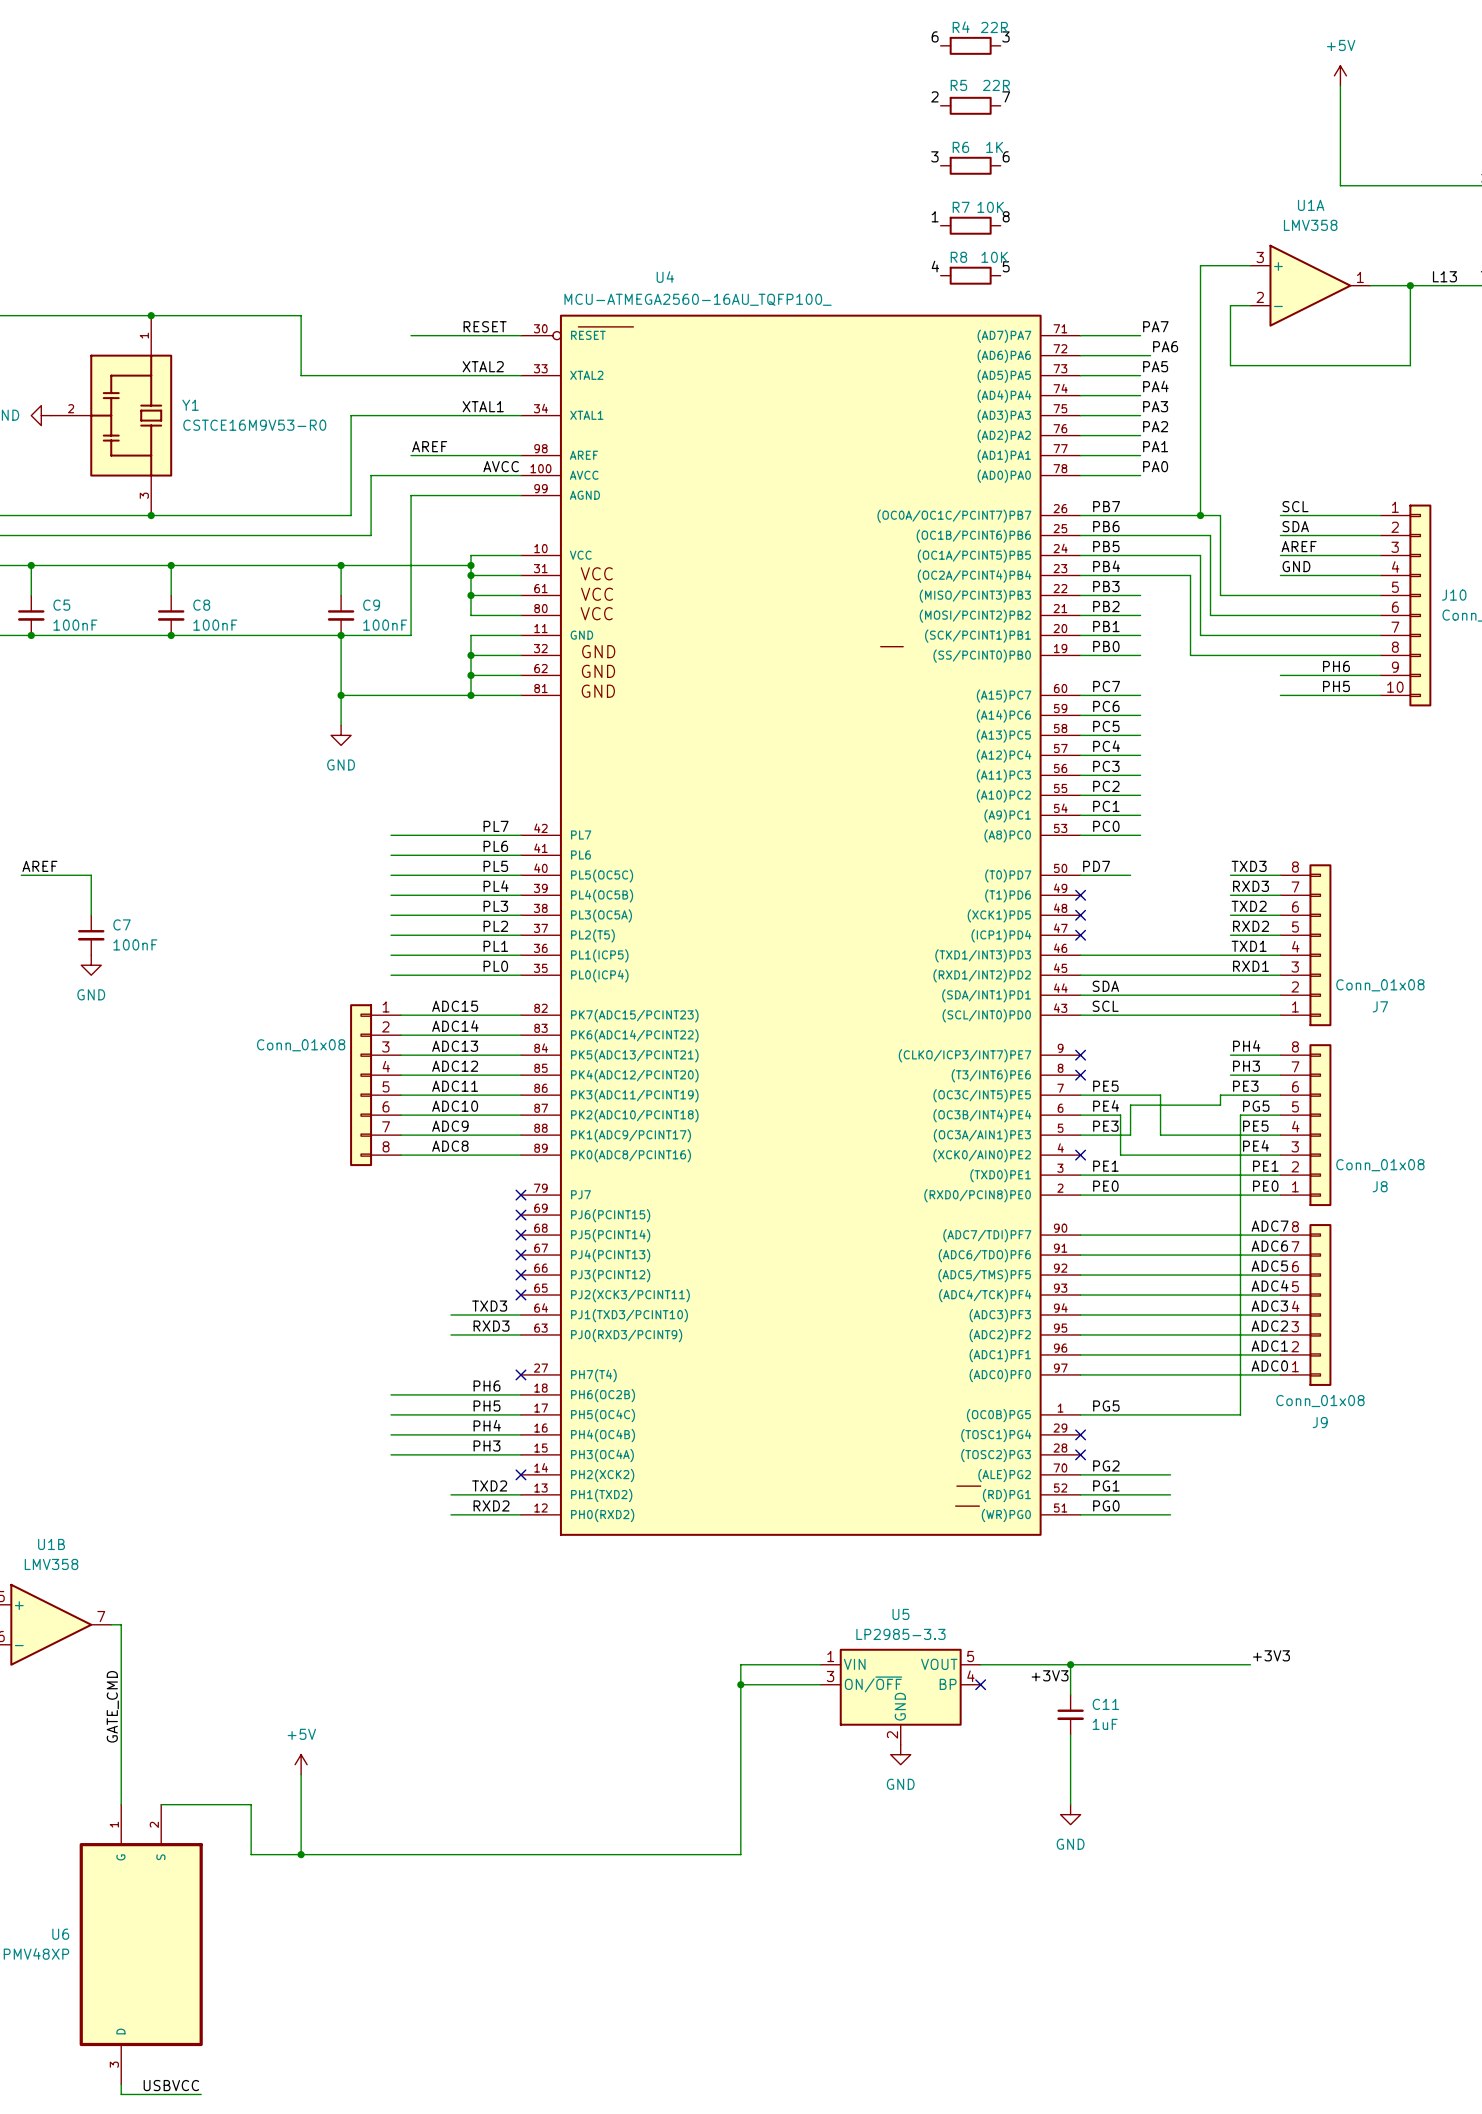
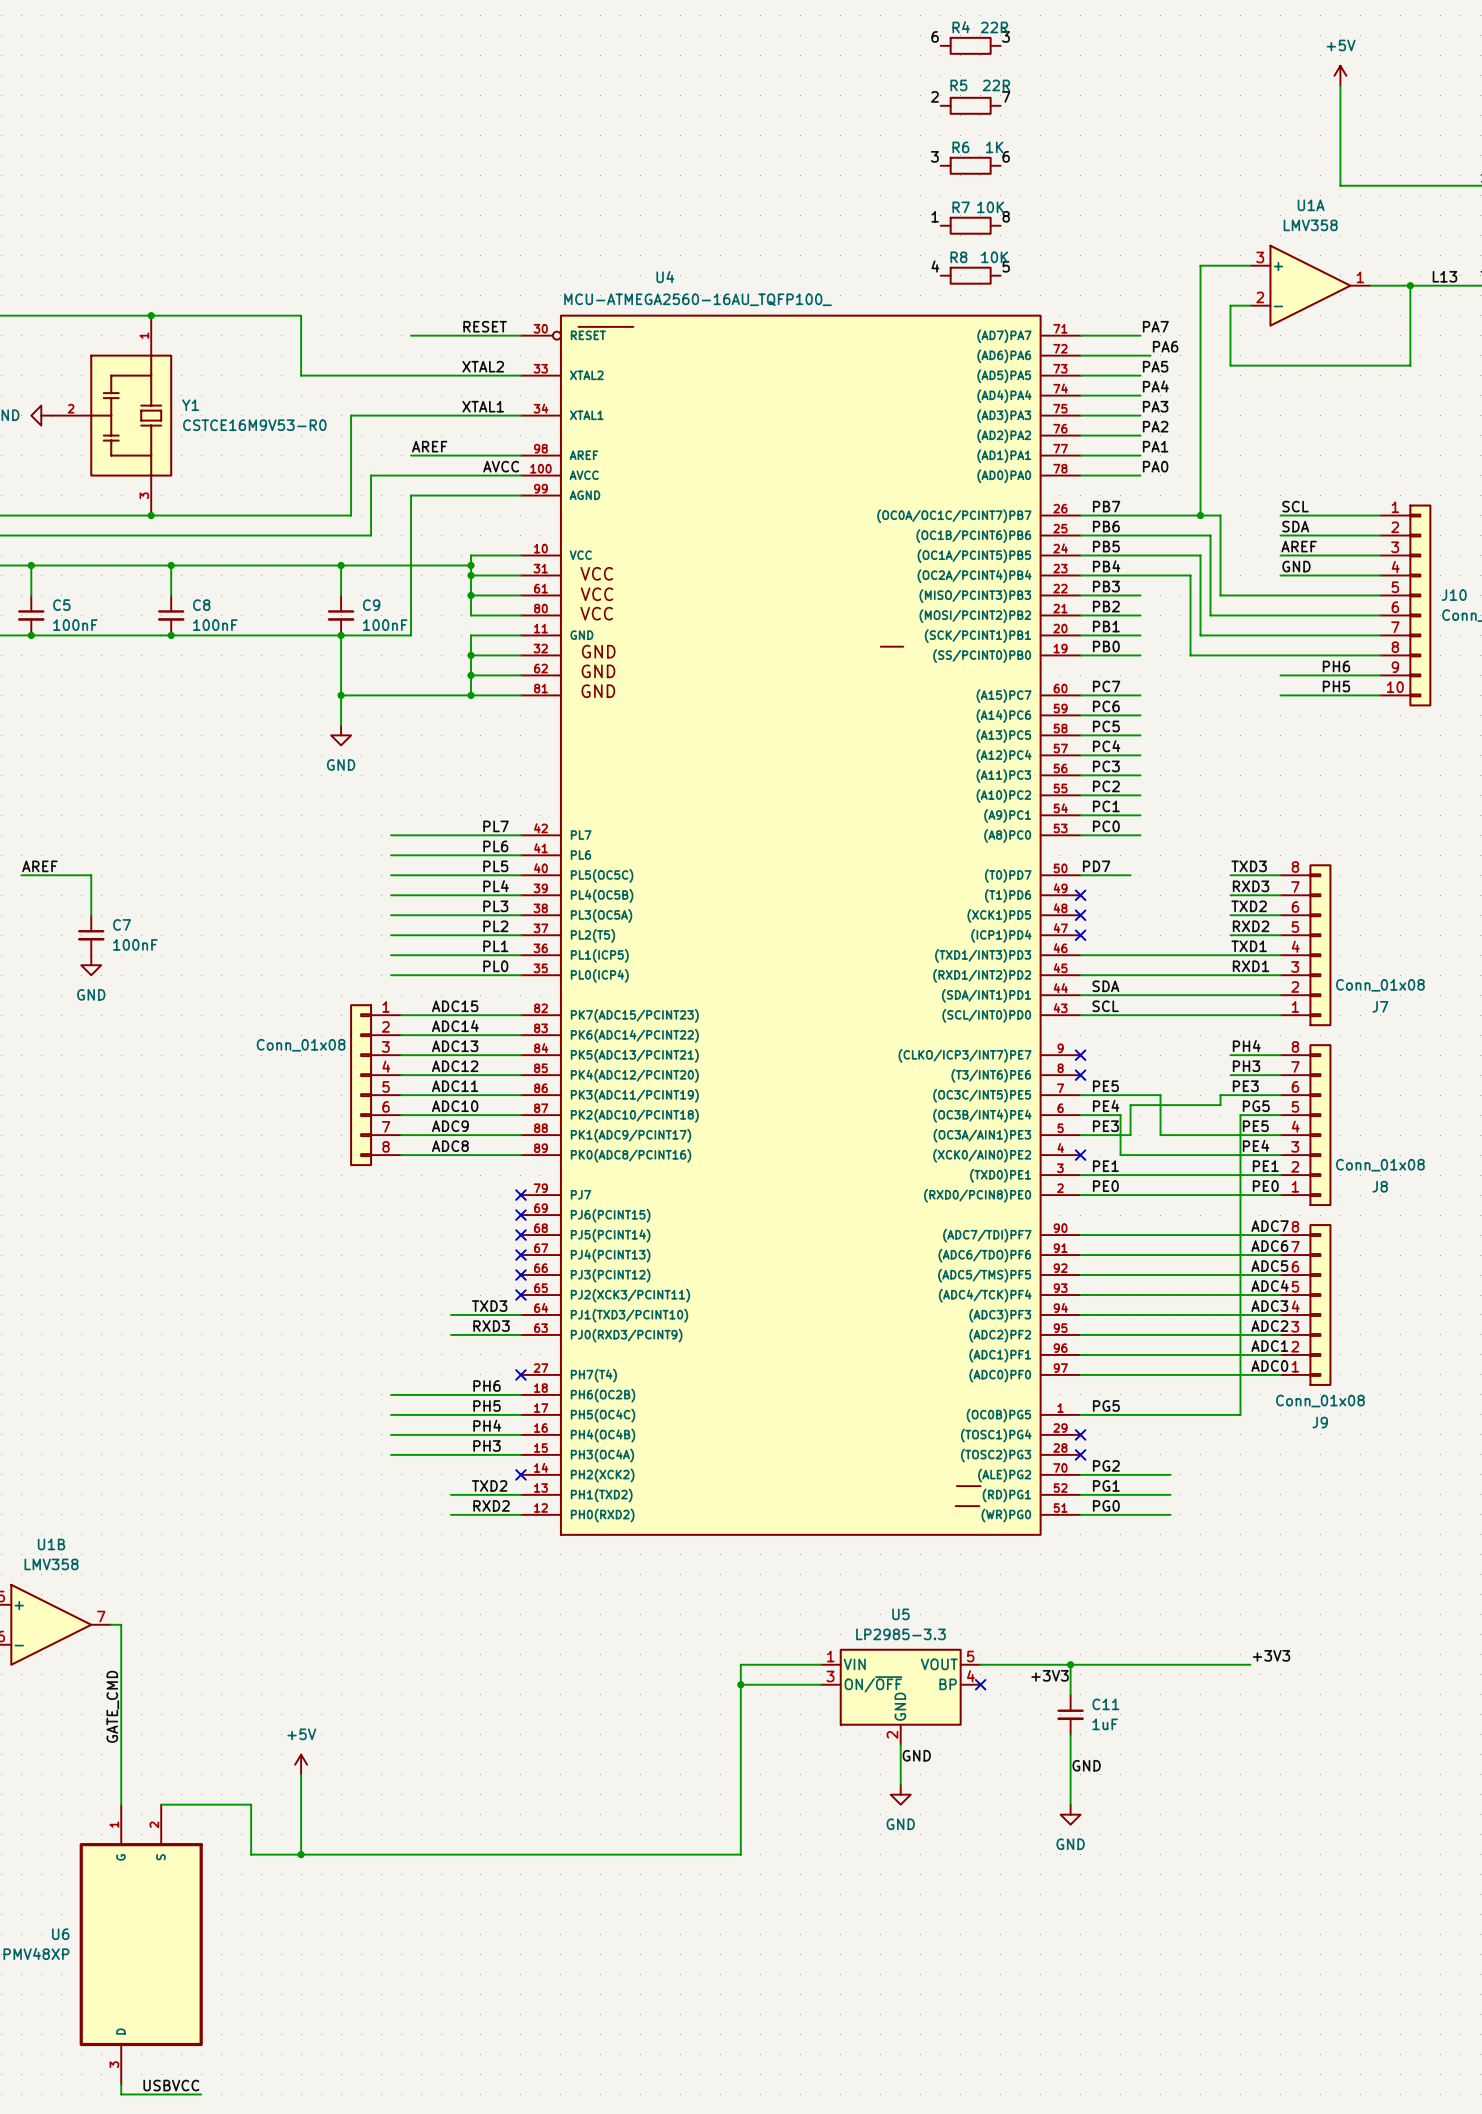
wire: none -> (900, 1744) (900, 1784)
power symbol position: GND (900, 1754) -> GND (900, 1794)
label: none -> GND (916, 1755)
label: none -> GND (1086, 1765)

